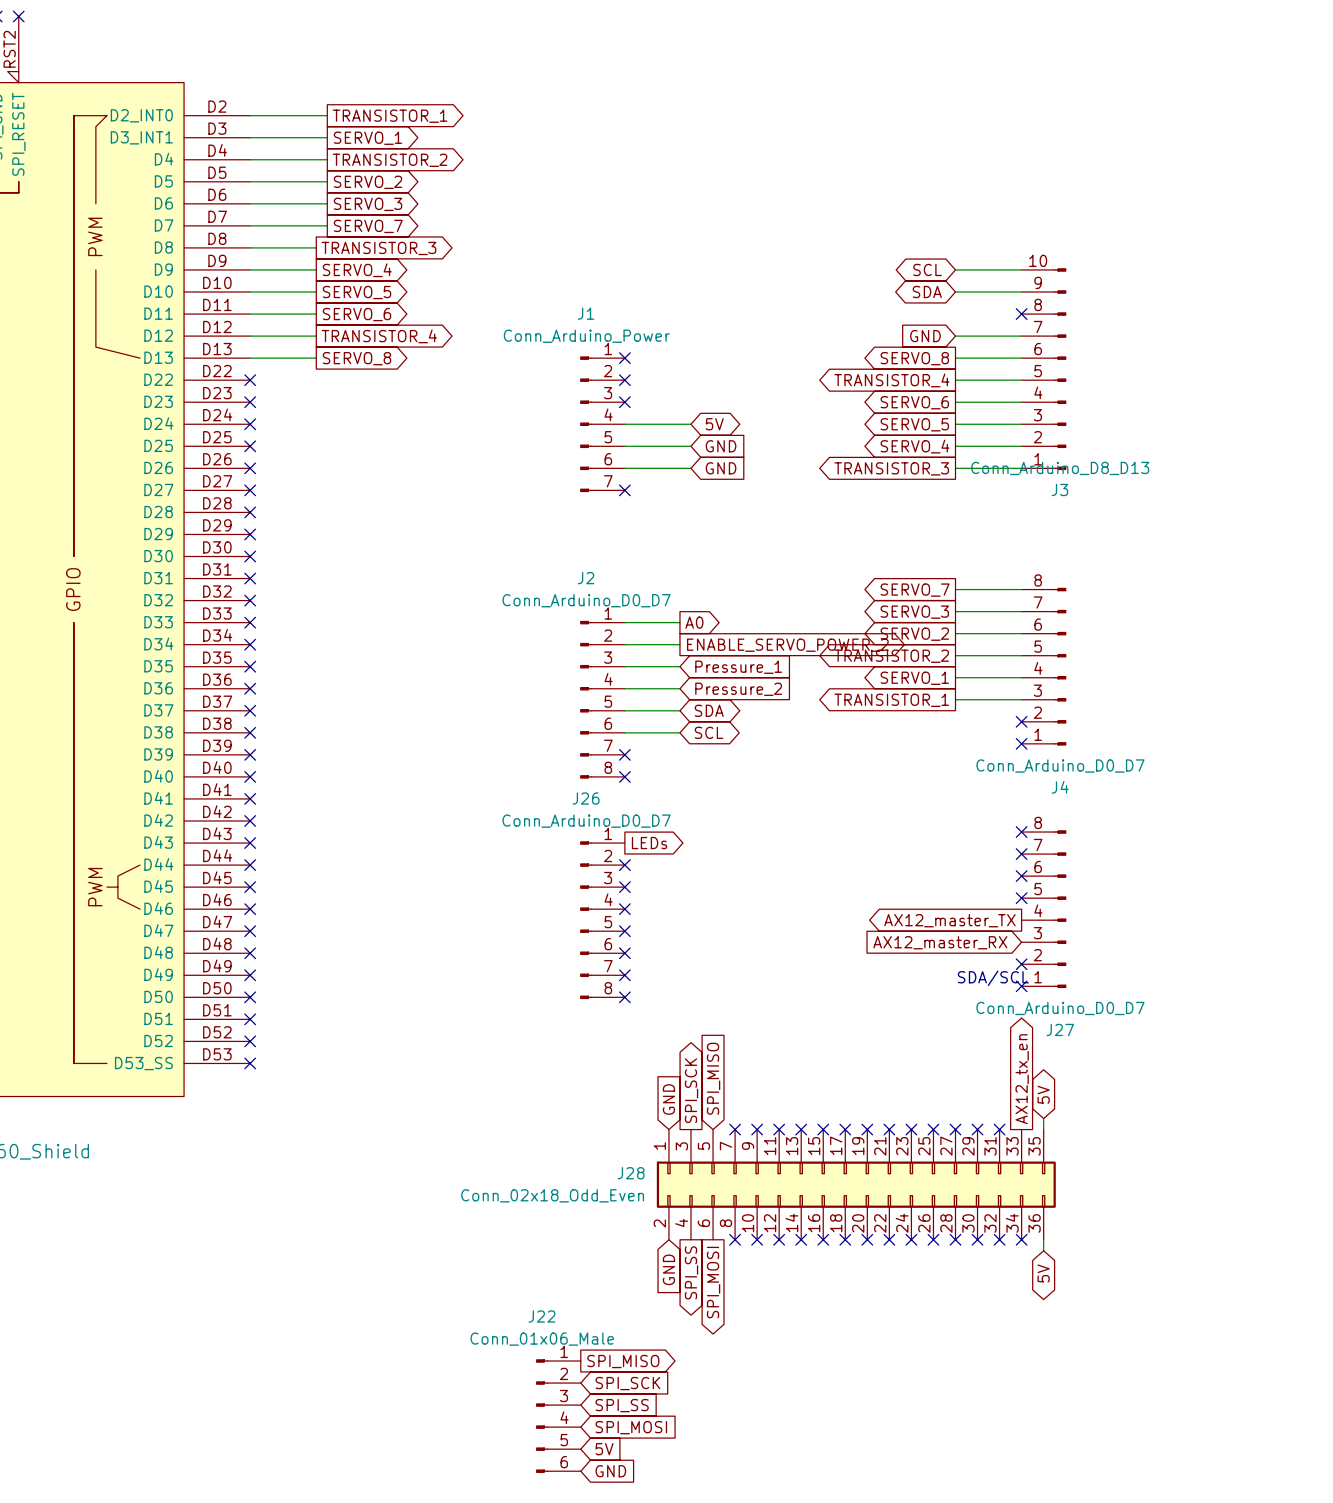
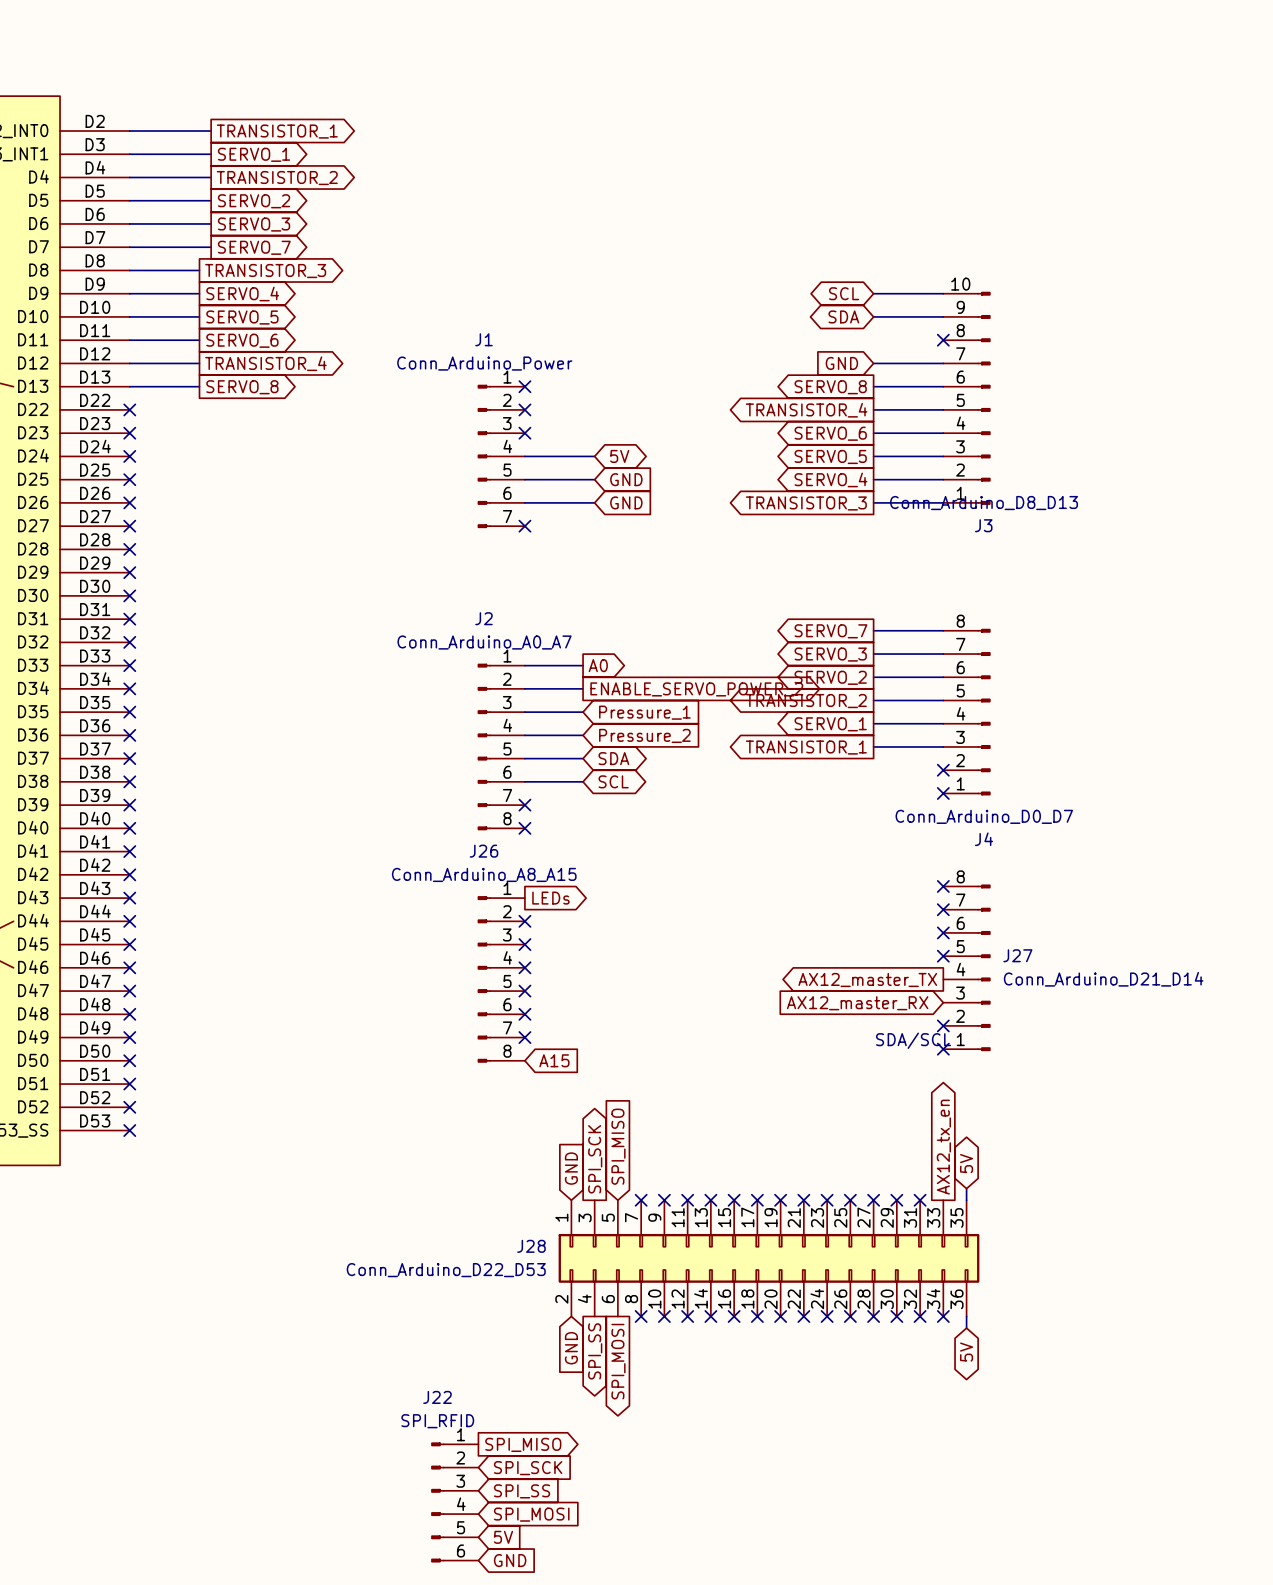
J2 value: Conn_Arduino_D0_D7 (586, 600) -> Conn_Arduino_A0_A7 (484, 642)
J26 value: Conn_Arduino_D0_D7 (586, 821) -> Conn_Arduino_A8_A15 (484, 874)
no-connect mark: (624, 997) -> none
global label: none -> A15 (554, 1060)
J27 value: Conn_Arduino_D0_D7 (1060, 1008) -> Conn_Arduino_D21_D14 (1103, 979)
J27 name position: J27 (1060, 1029) -> J27 (1017, 955)
J28 value: Conn_02x18_Odd_Even (552, 1195) -> Conn_Arduino_D22_D53 (446, 1270)
J22 value: Conn_01x06_Male (542, 1339) -> SPI_RFID (437, 1421)

